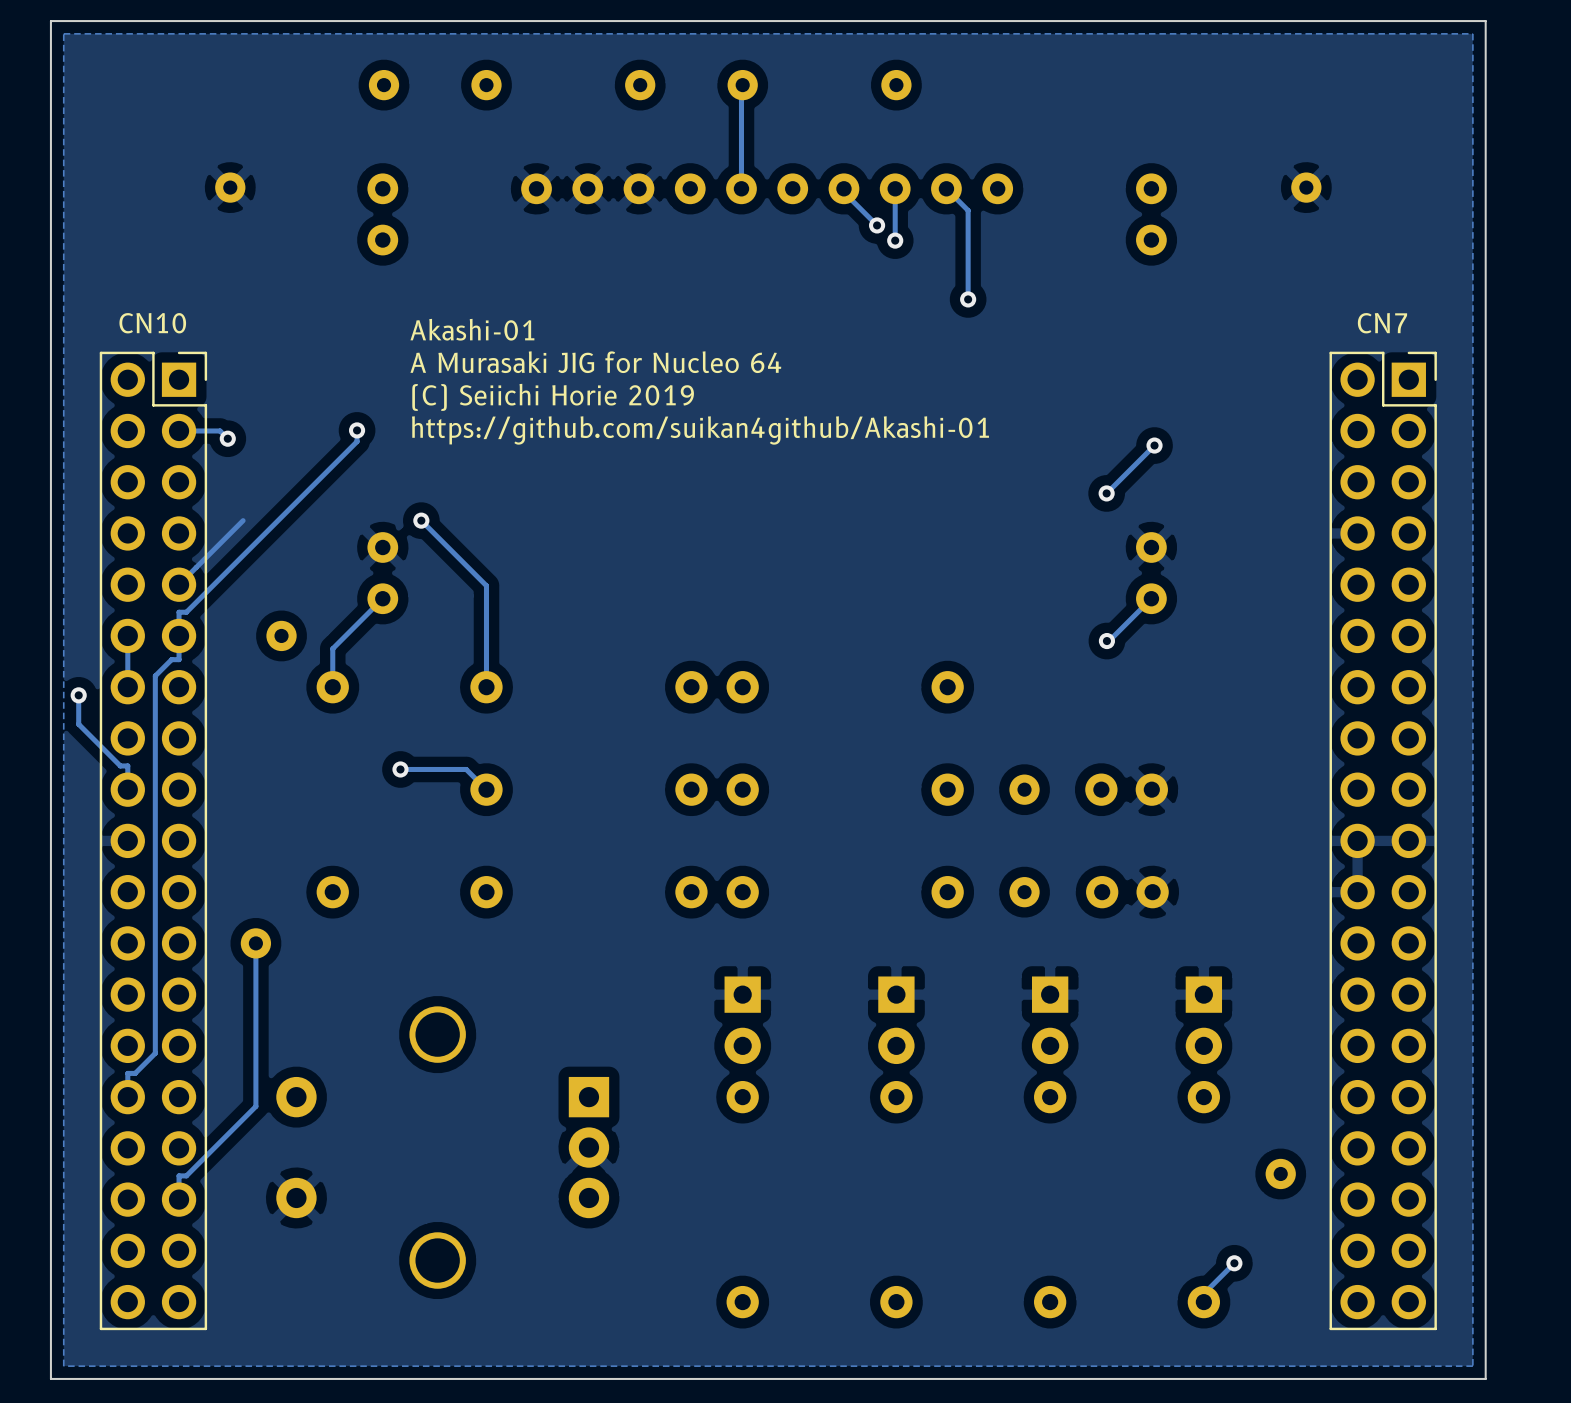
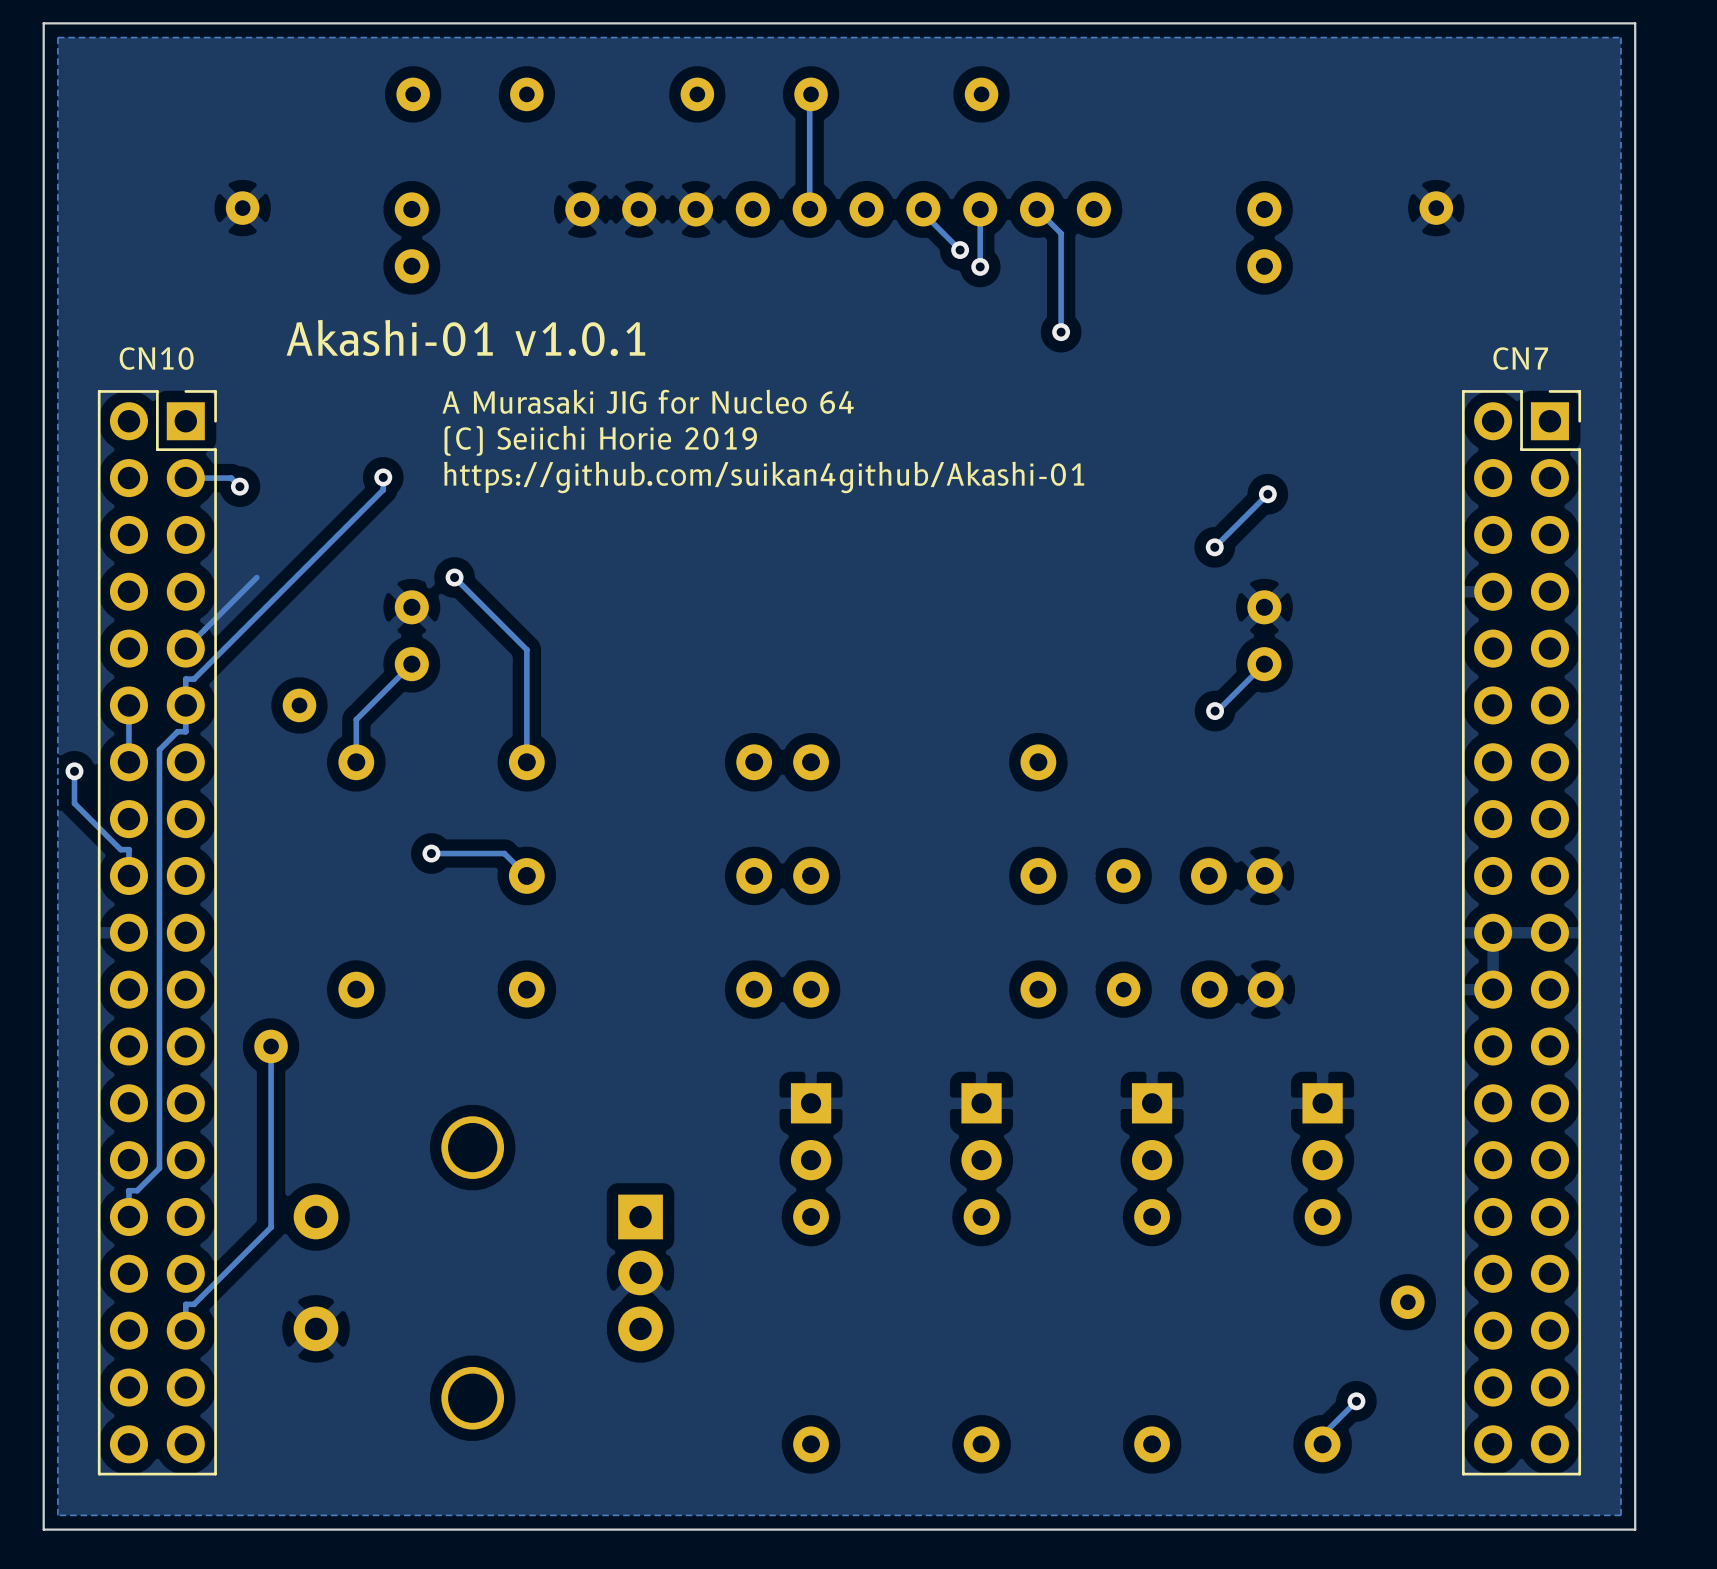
text: Akashi-01 (472, 329) -> Akashi-01 v1.0.1 (465, 338)

